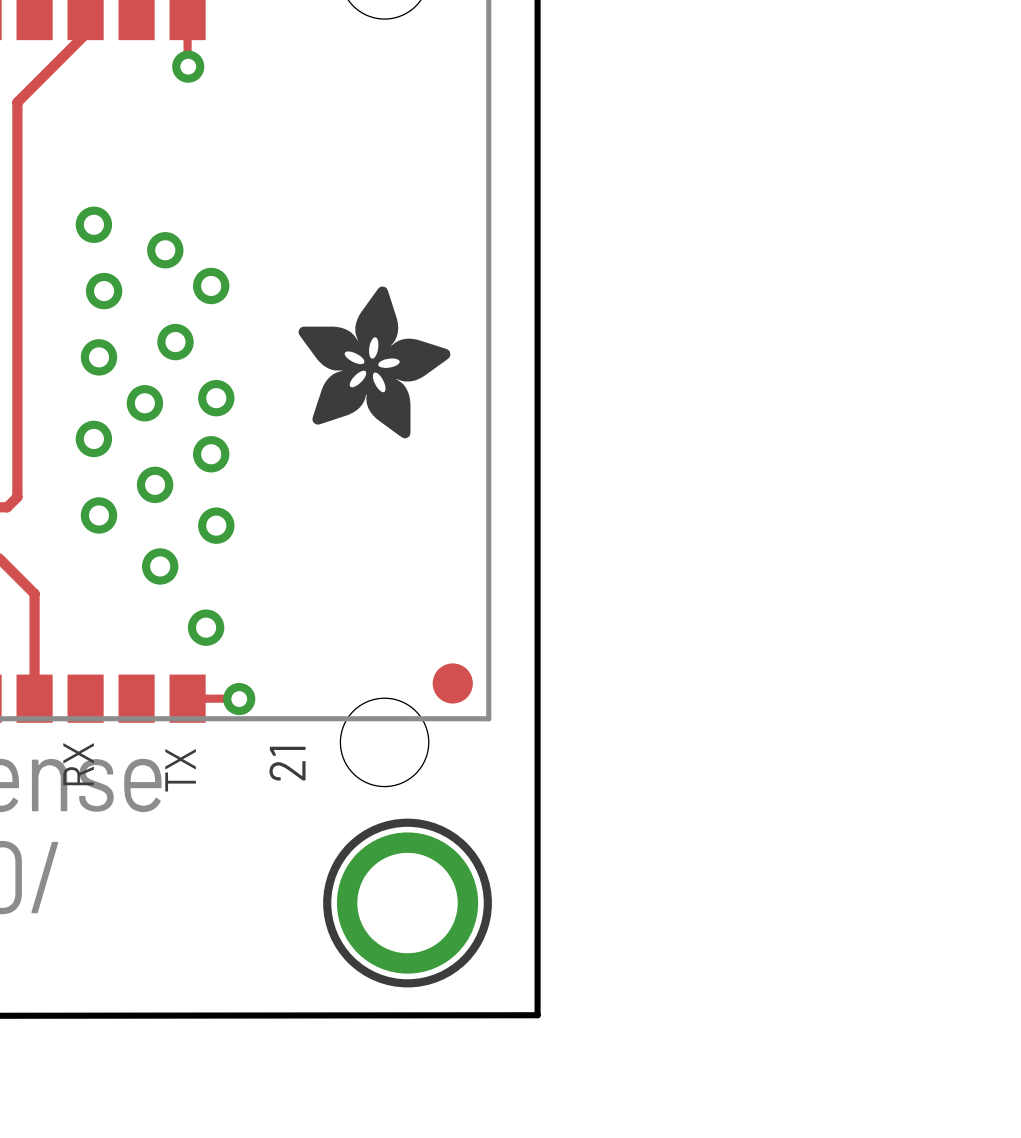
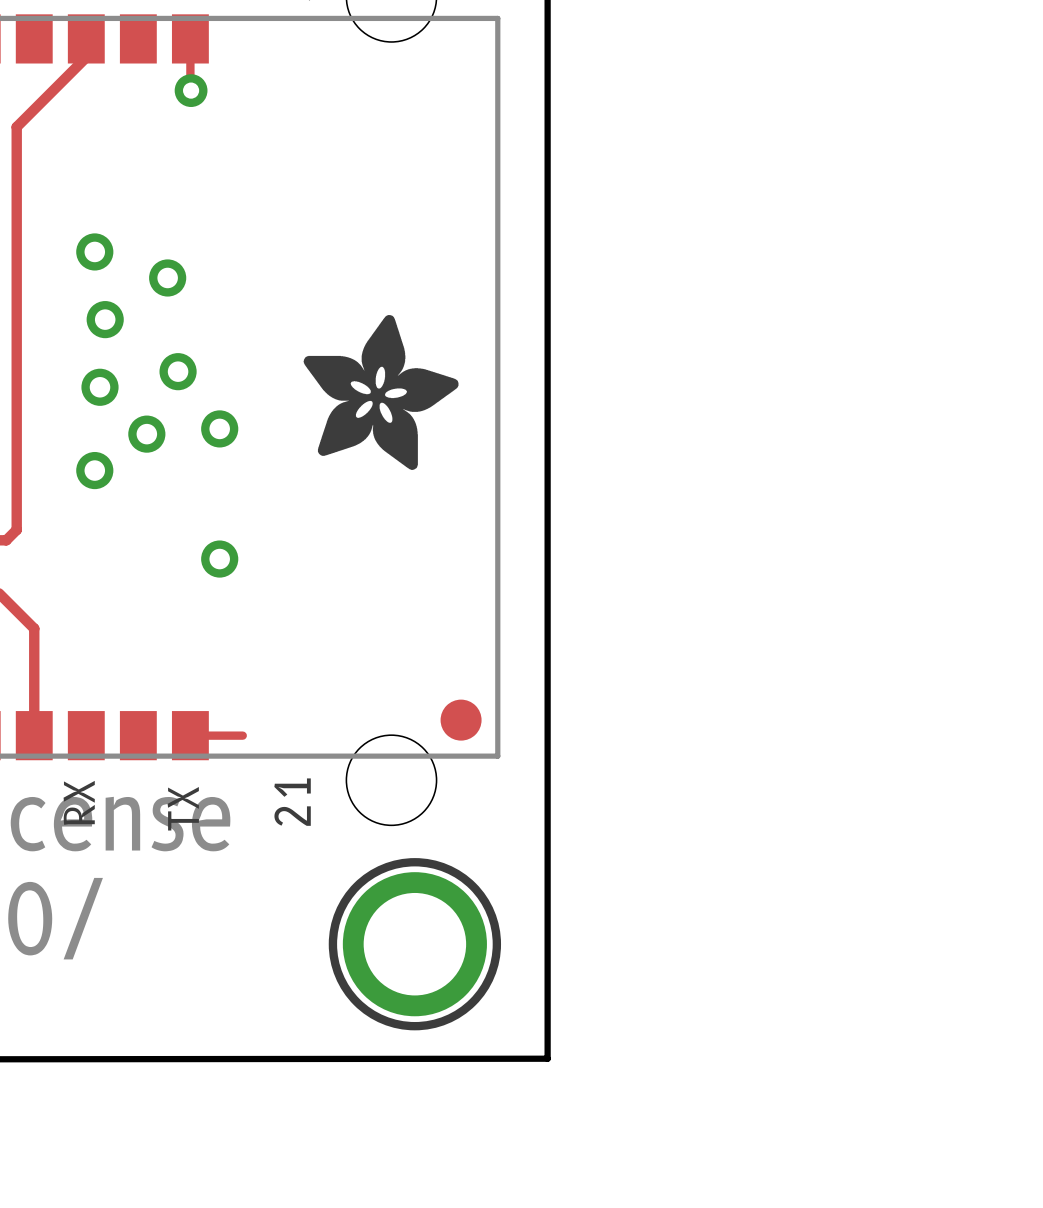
via: (211, 285) -> none
via: (211, 454) -> none
via: (155, 484) -> none
via: (99, 515) -> none
via: (160, 566) -> none
via: (206, 627) -> none
via: (239, 699) -> none

